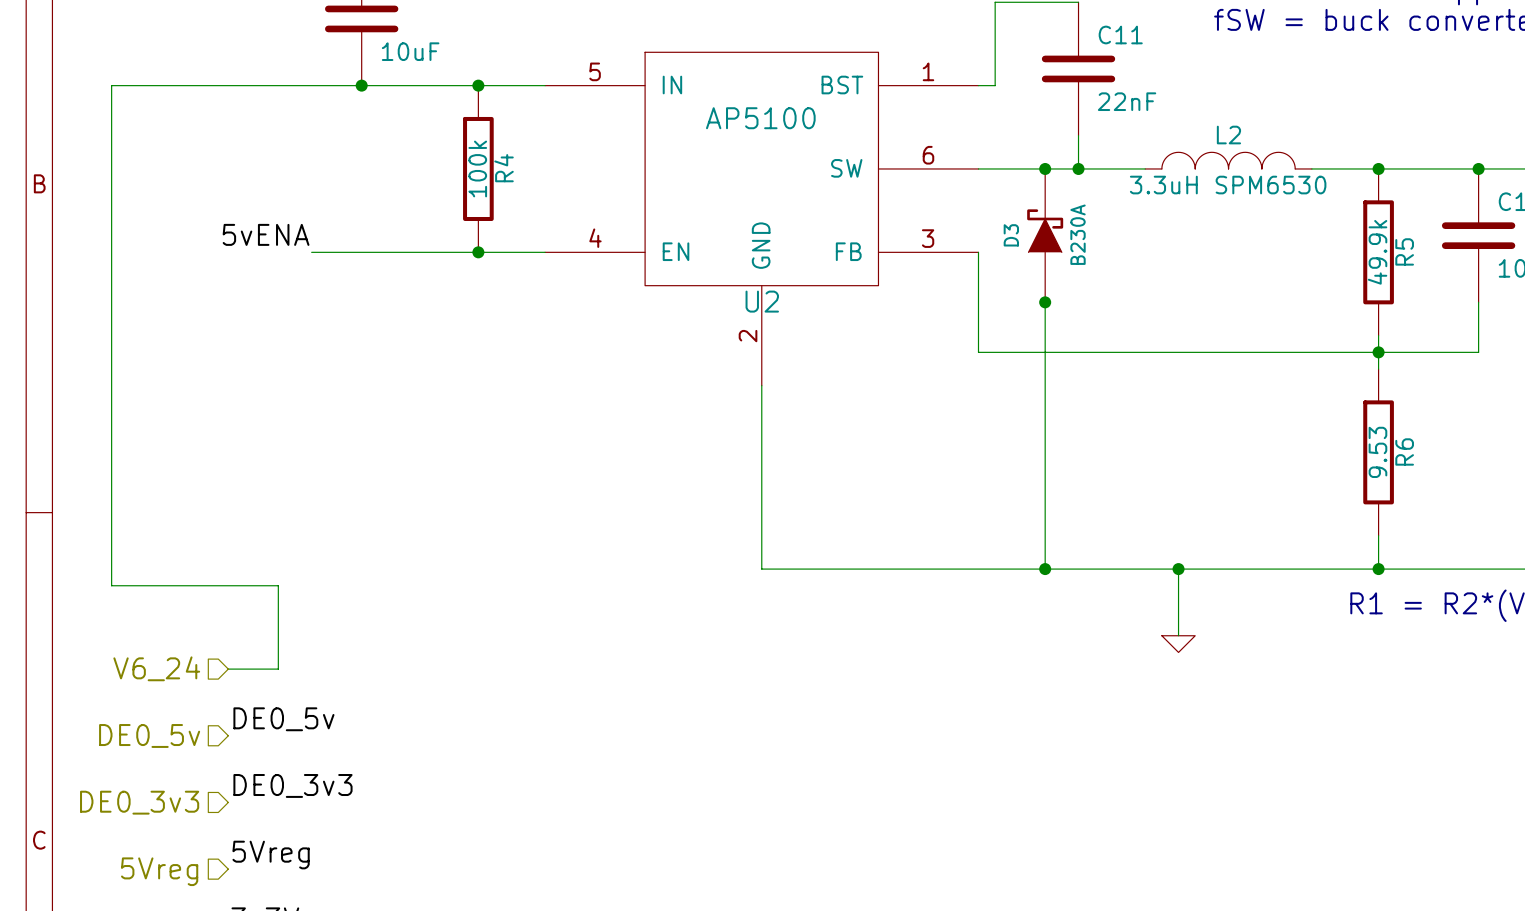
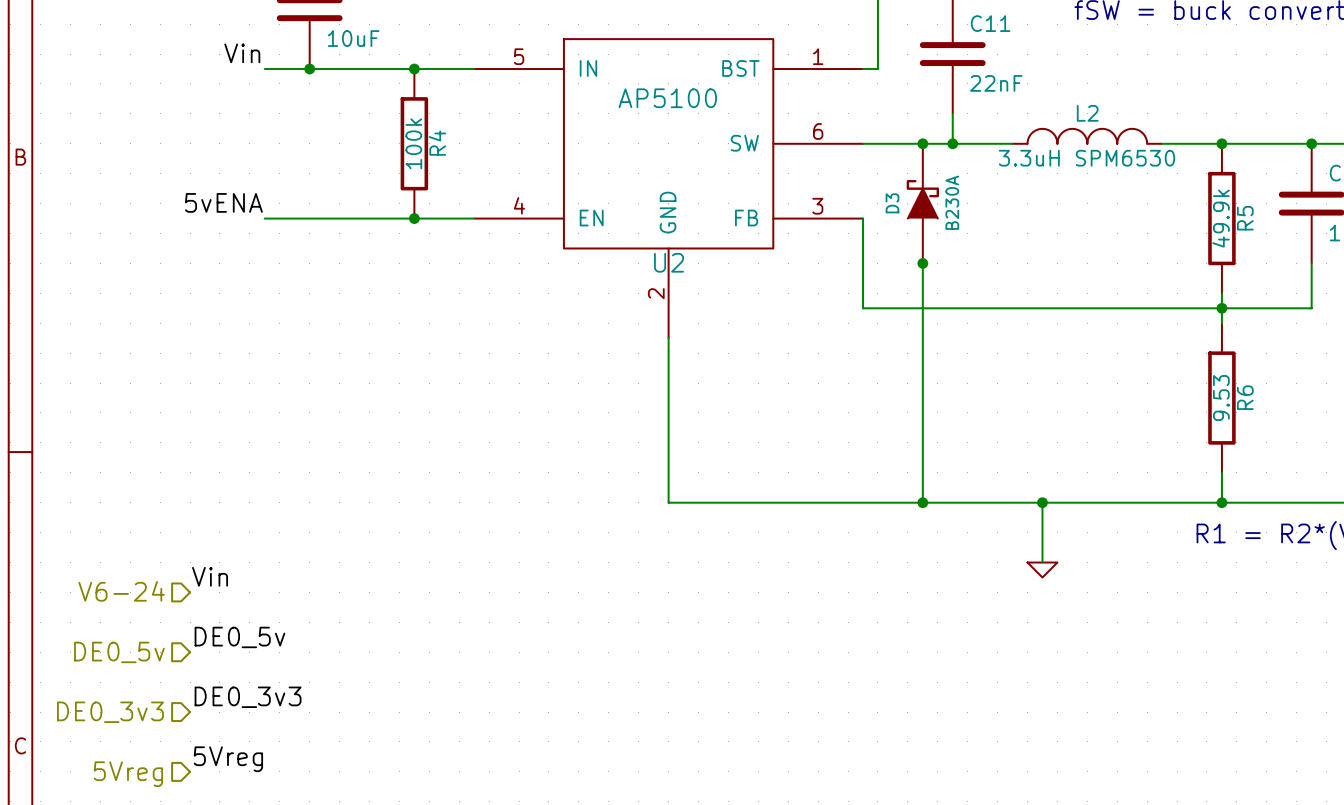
label: none -> Vin (242, 53)
wire: (311, 85) (111, 85) (111, 585) (278, 585) (278, 669) (228, 669) -> none
label: none -> Vin (210, 576)
hierarchical label: V6_24 (156, 668) -> V6-24 (121, 591)

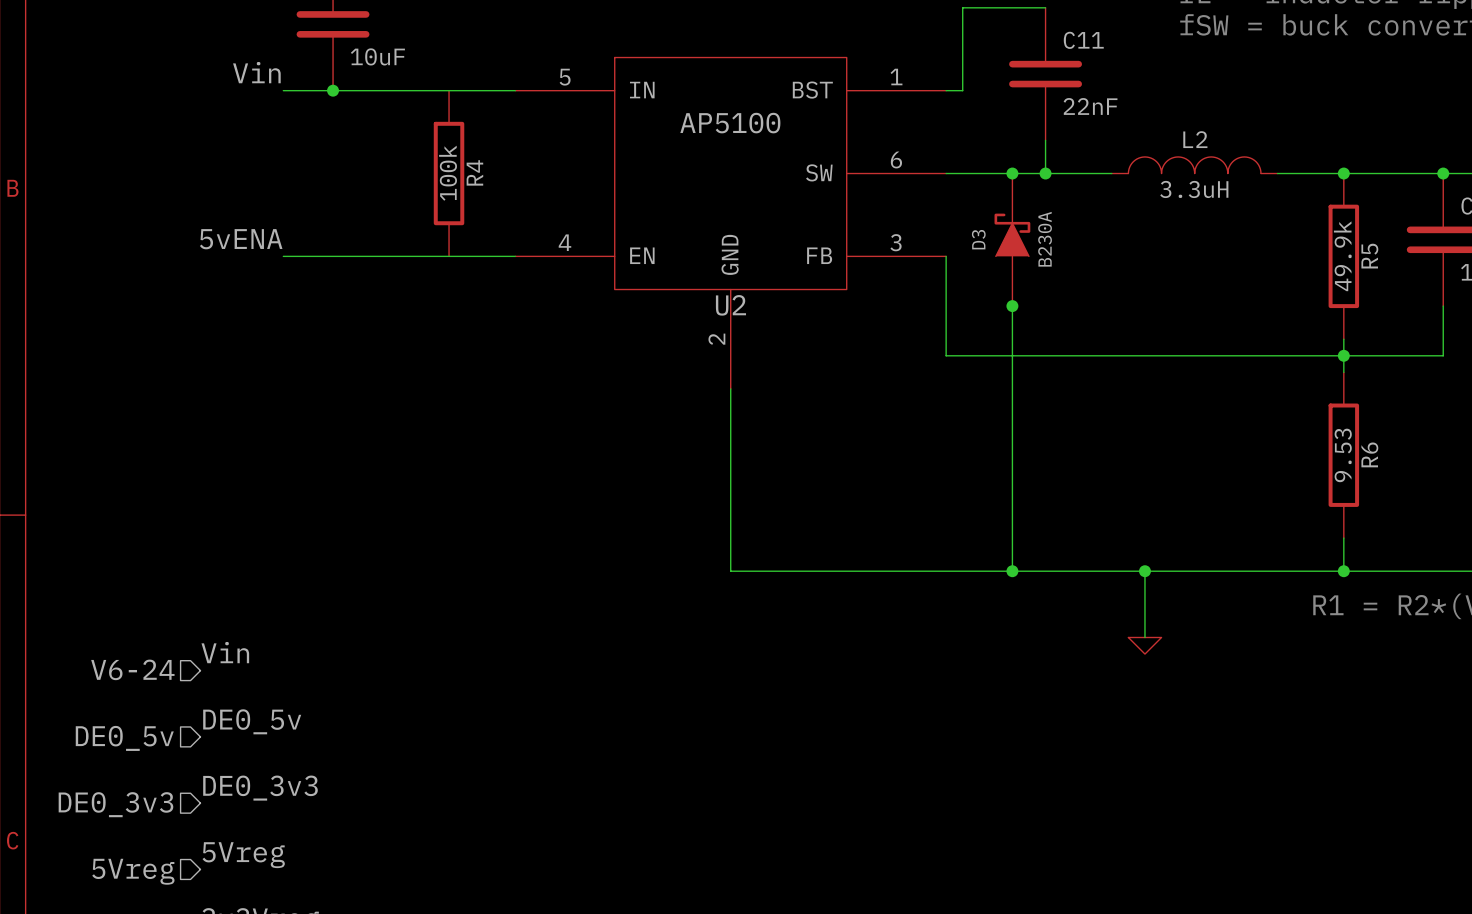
junction: (414, 69) -> none
L2 value: 3.3uH SPM6530 (1086, 158) -> 3.3uH (1194, 189)
junction: (414, 218) -> none

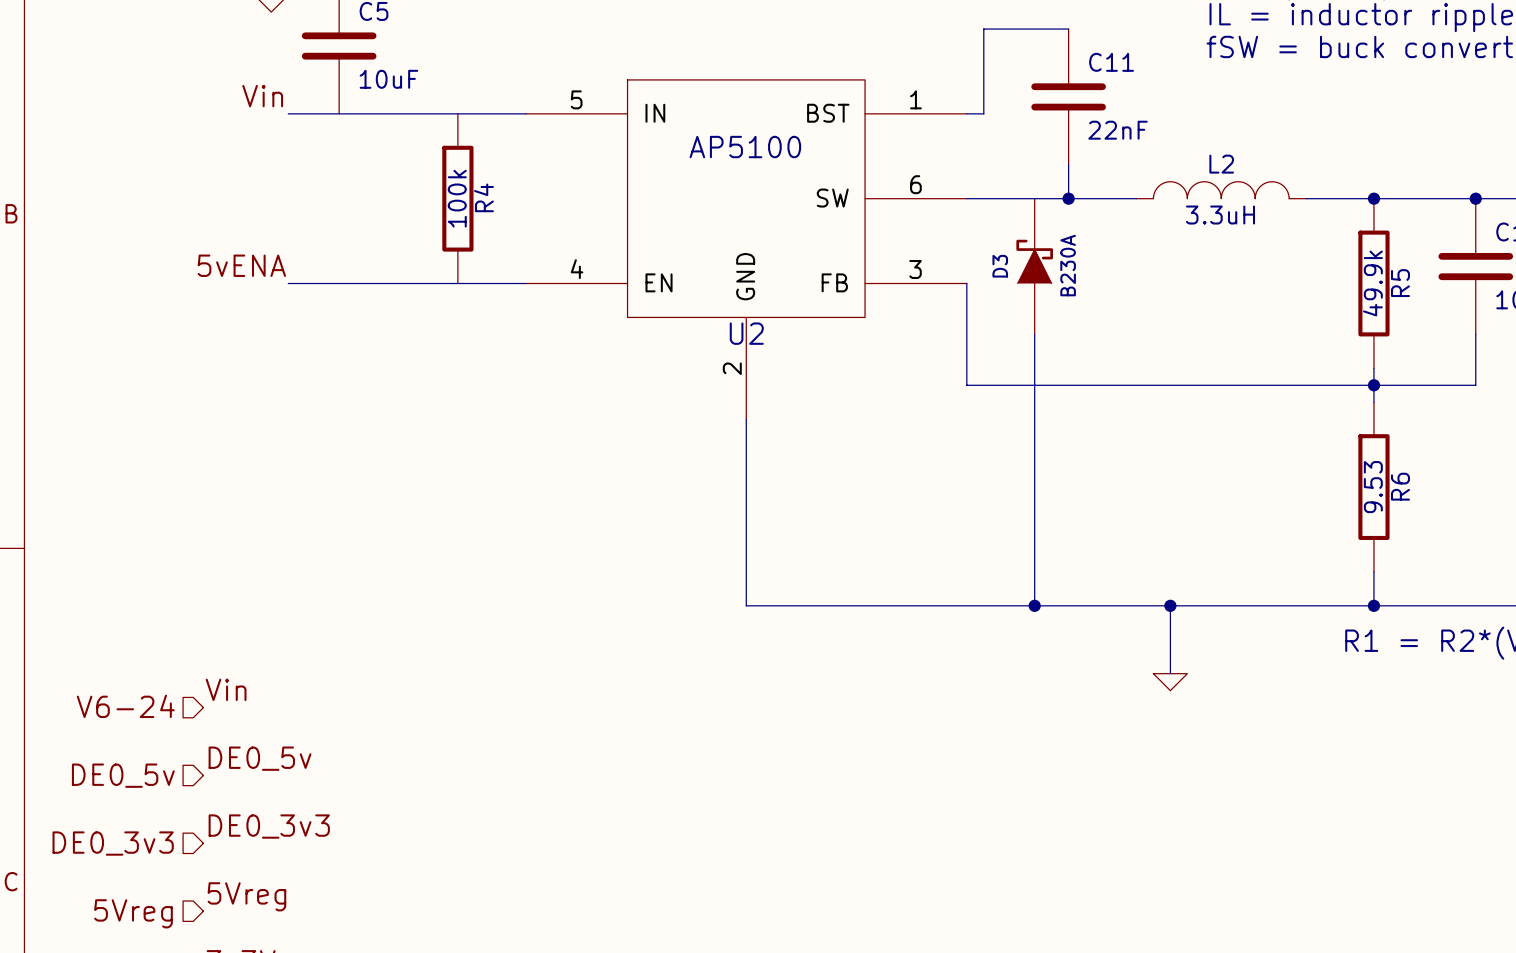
junction: (333, 90) -> none
junction: (1012, 173) -> none
junction: (1012, 306) -> none

